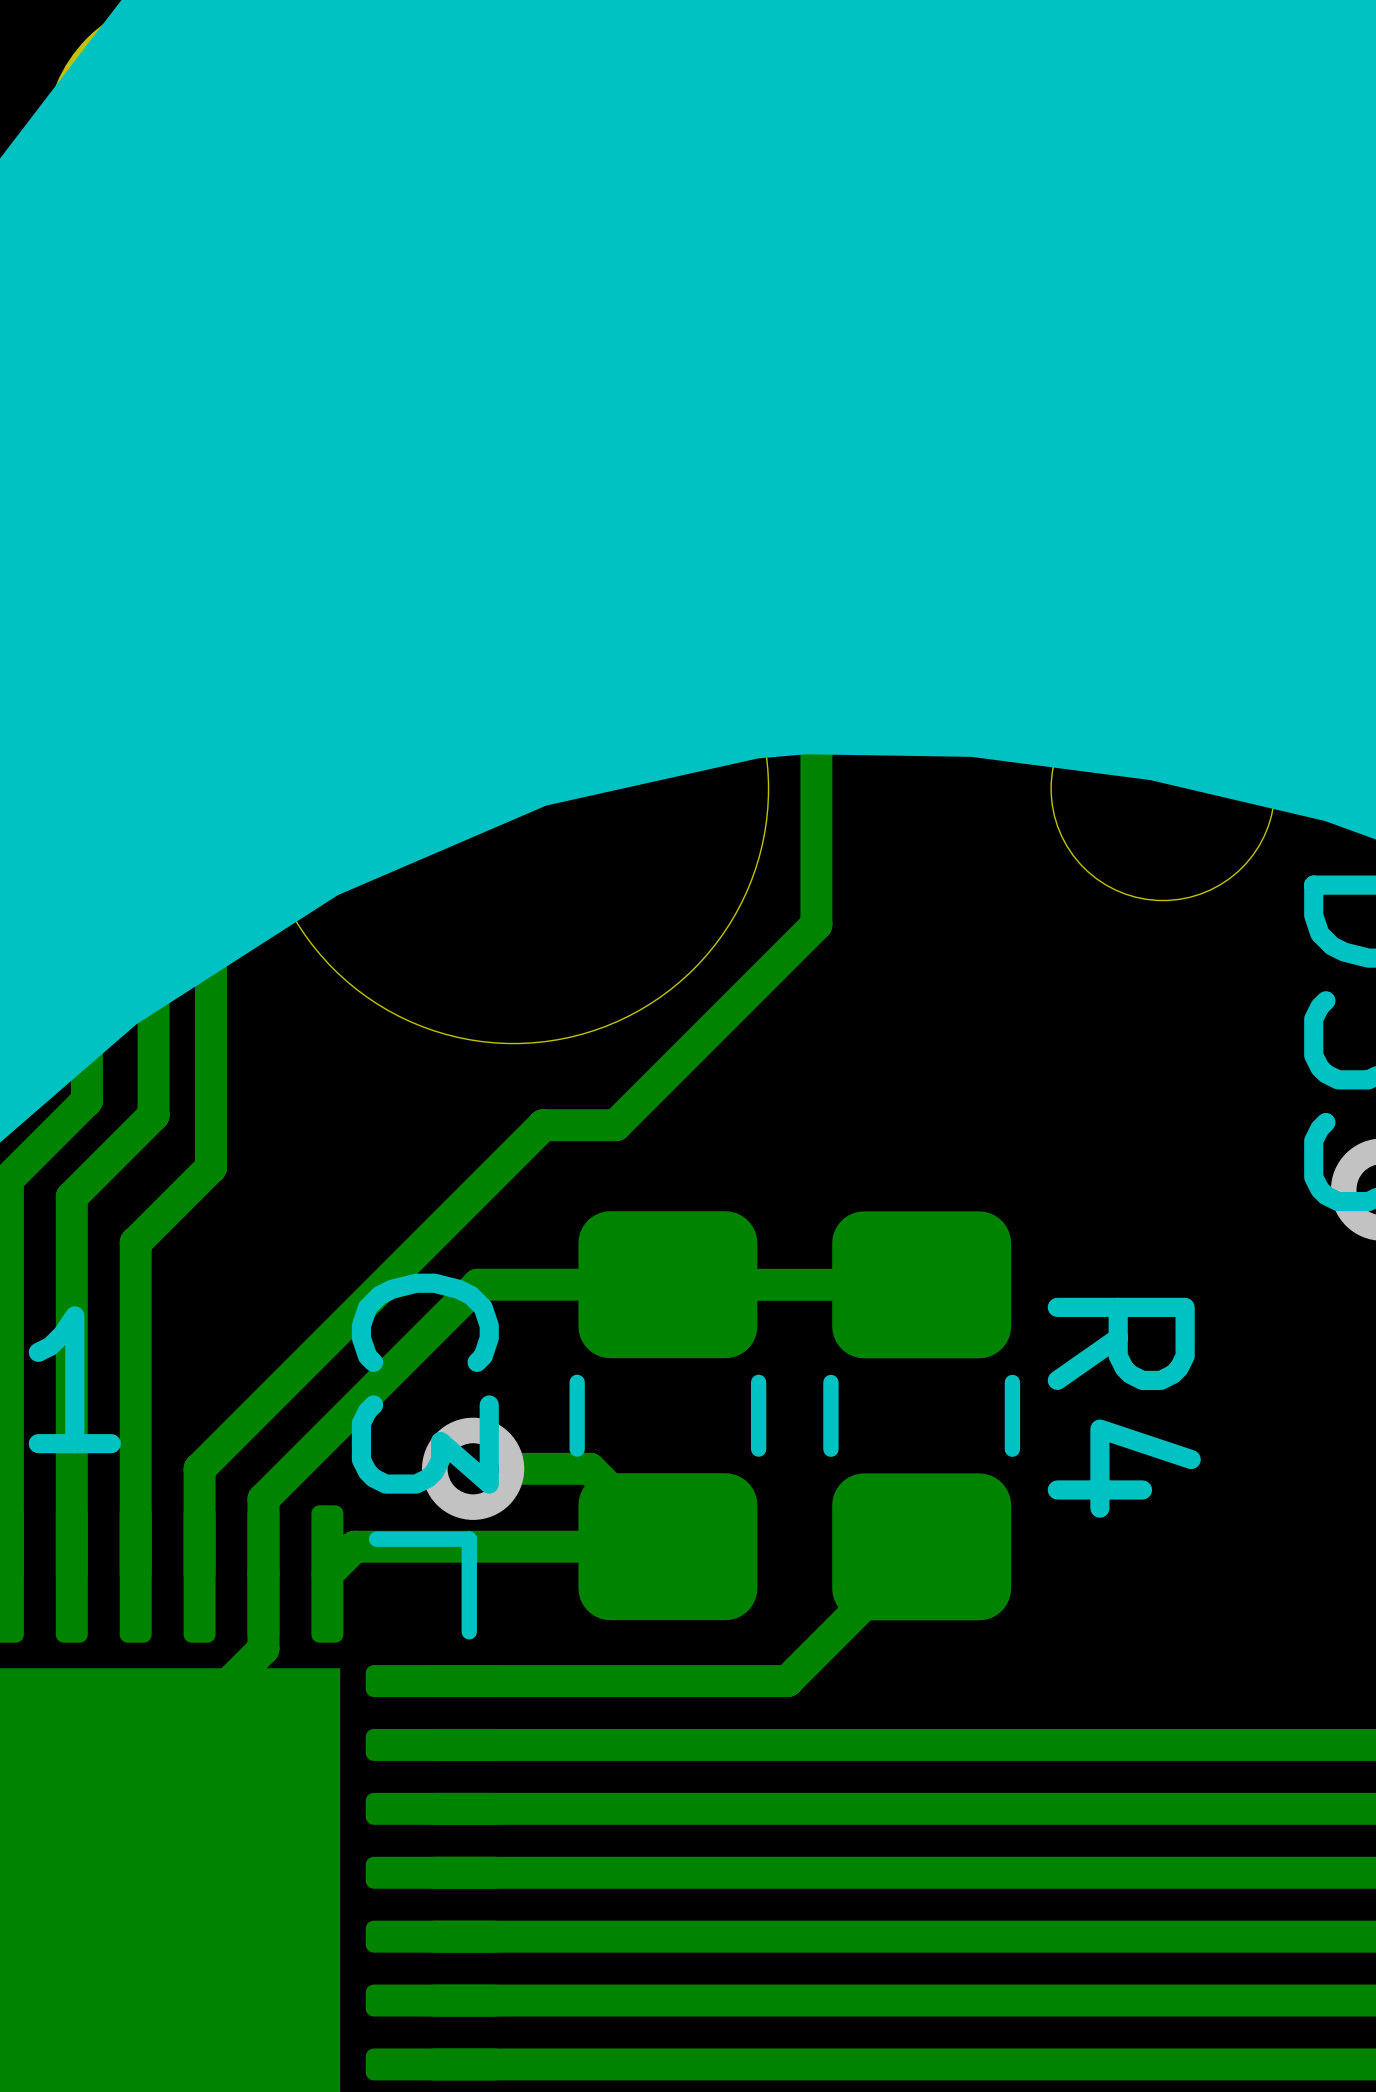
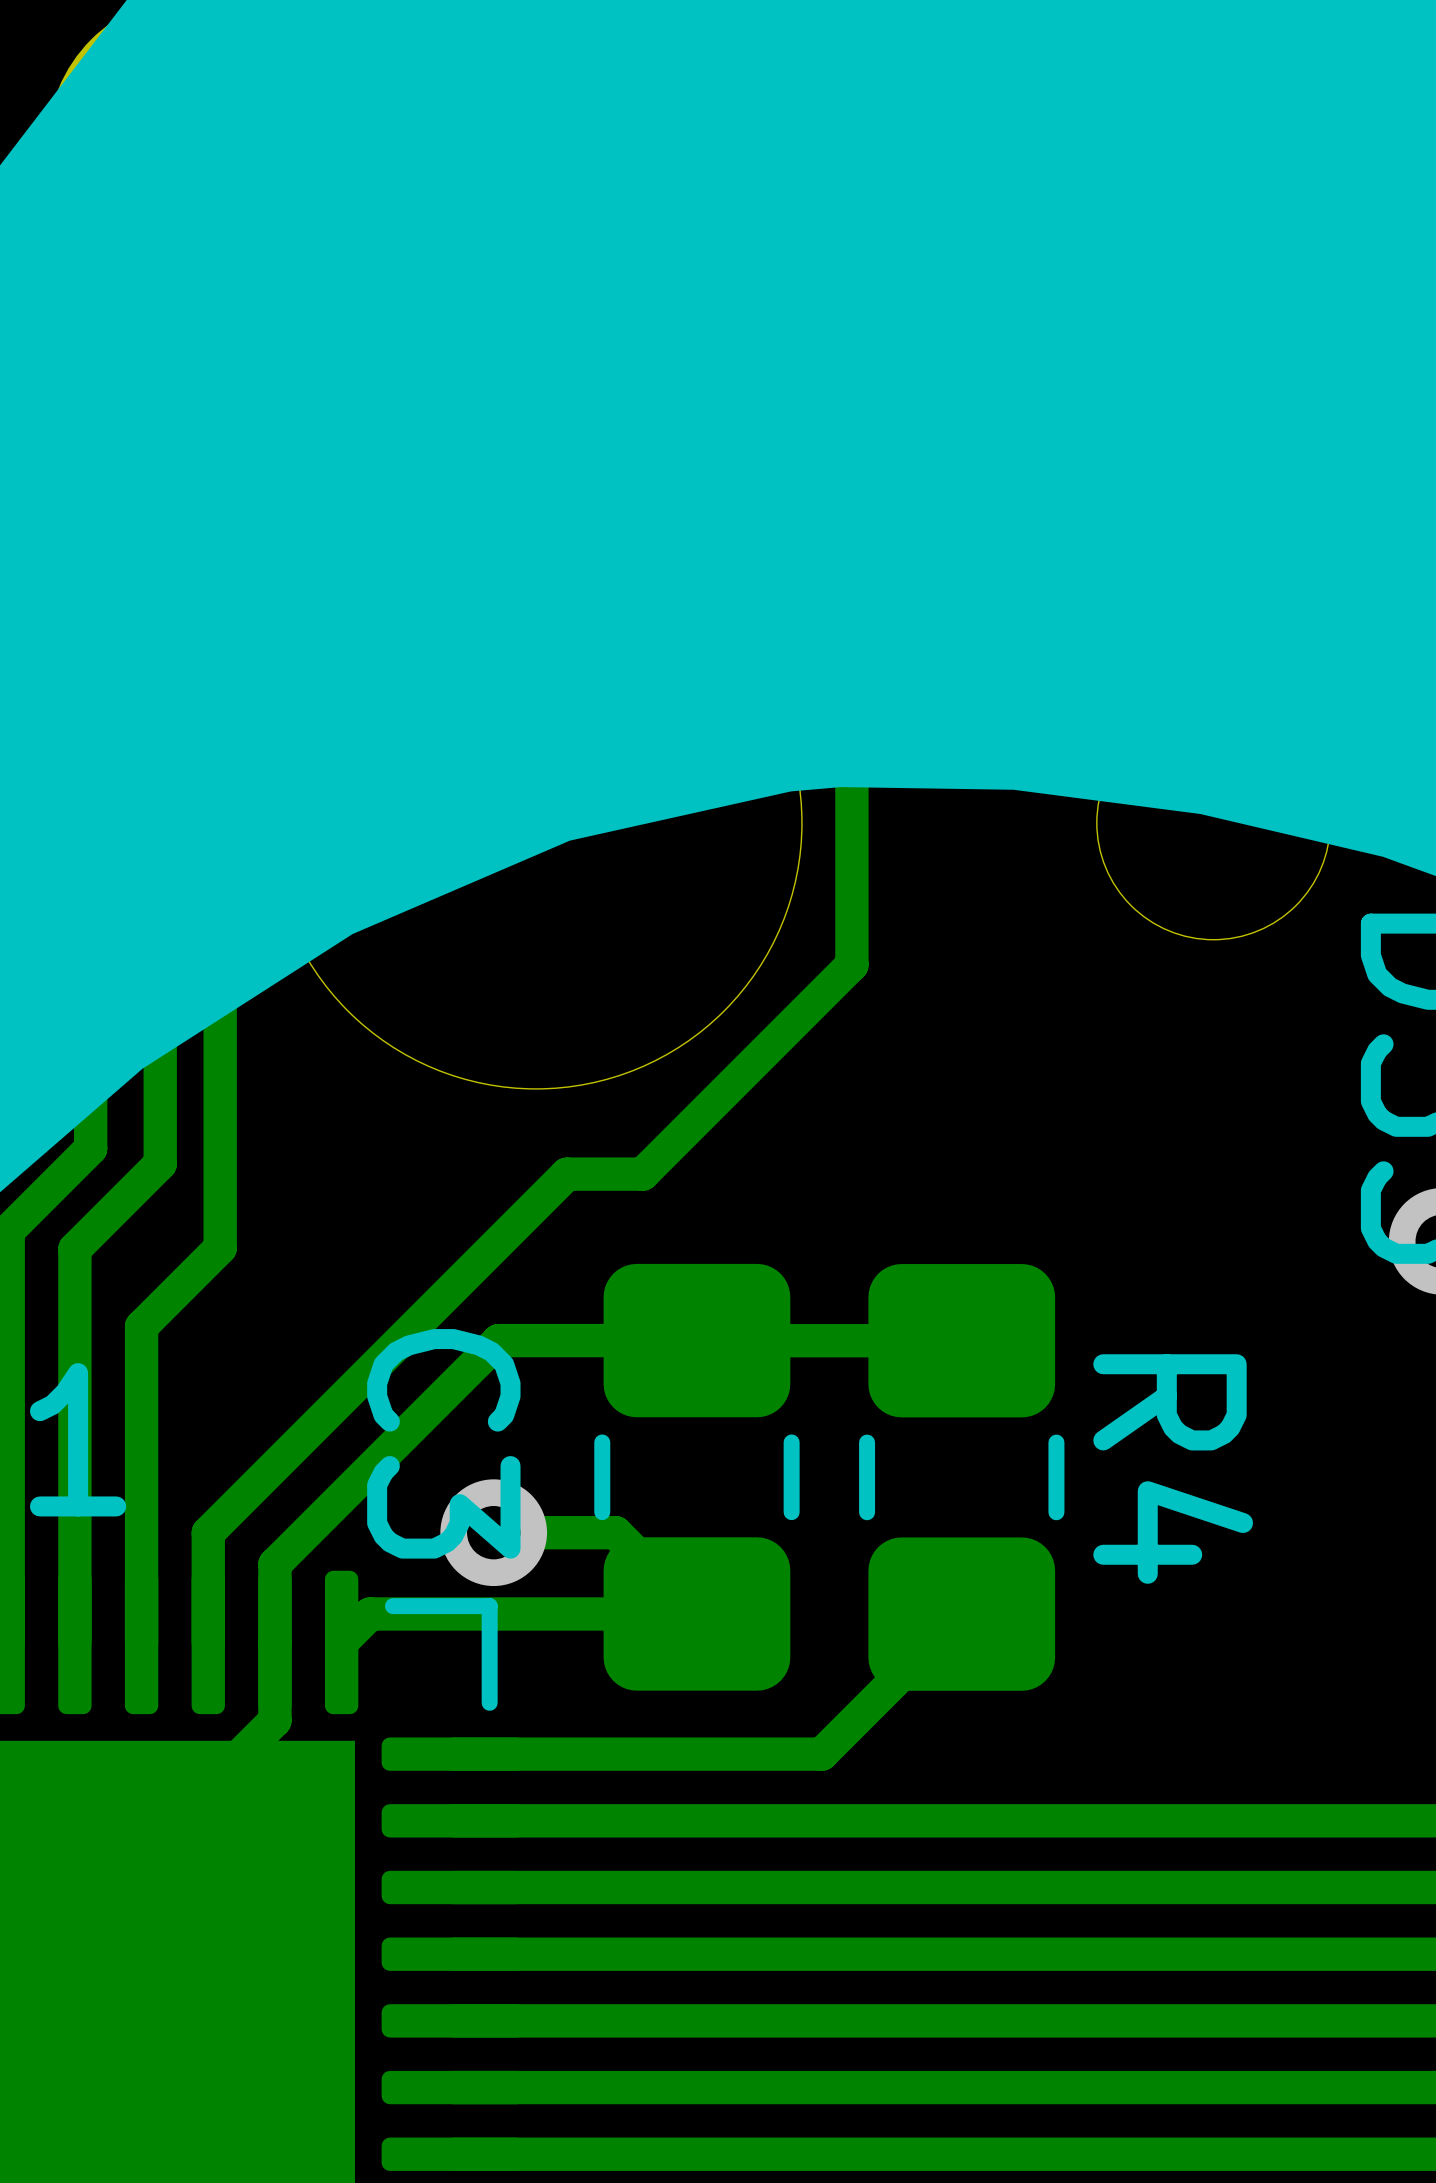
track: (211, 1167) (135, 1242) (135, 1271) -> (220, 1218) (220, 1247) (141, 1326)

